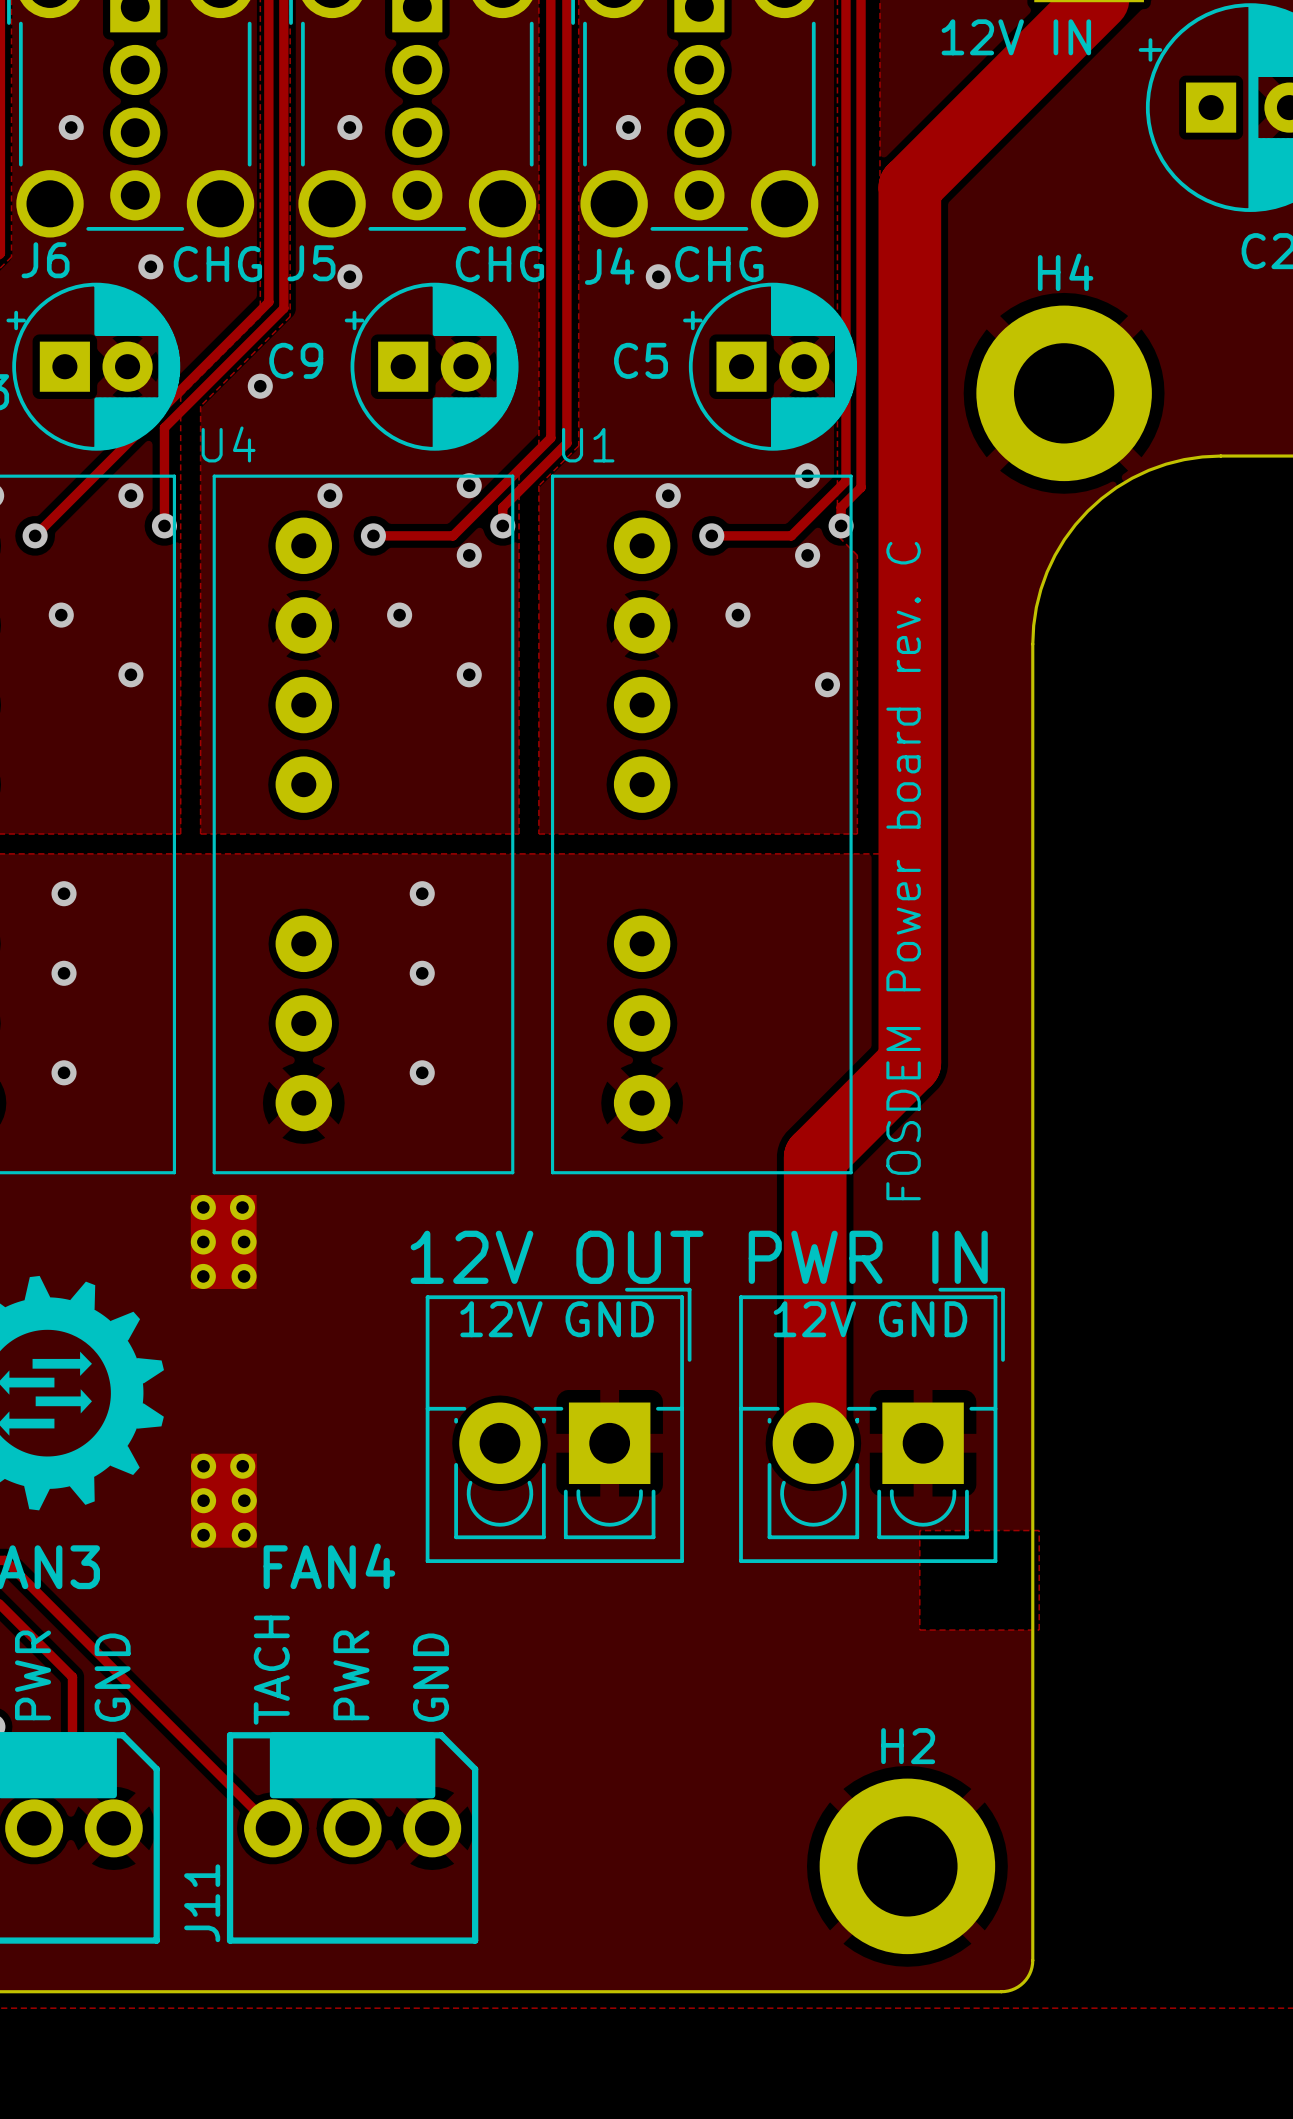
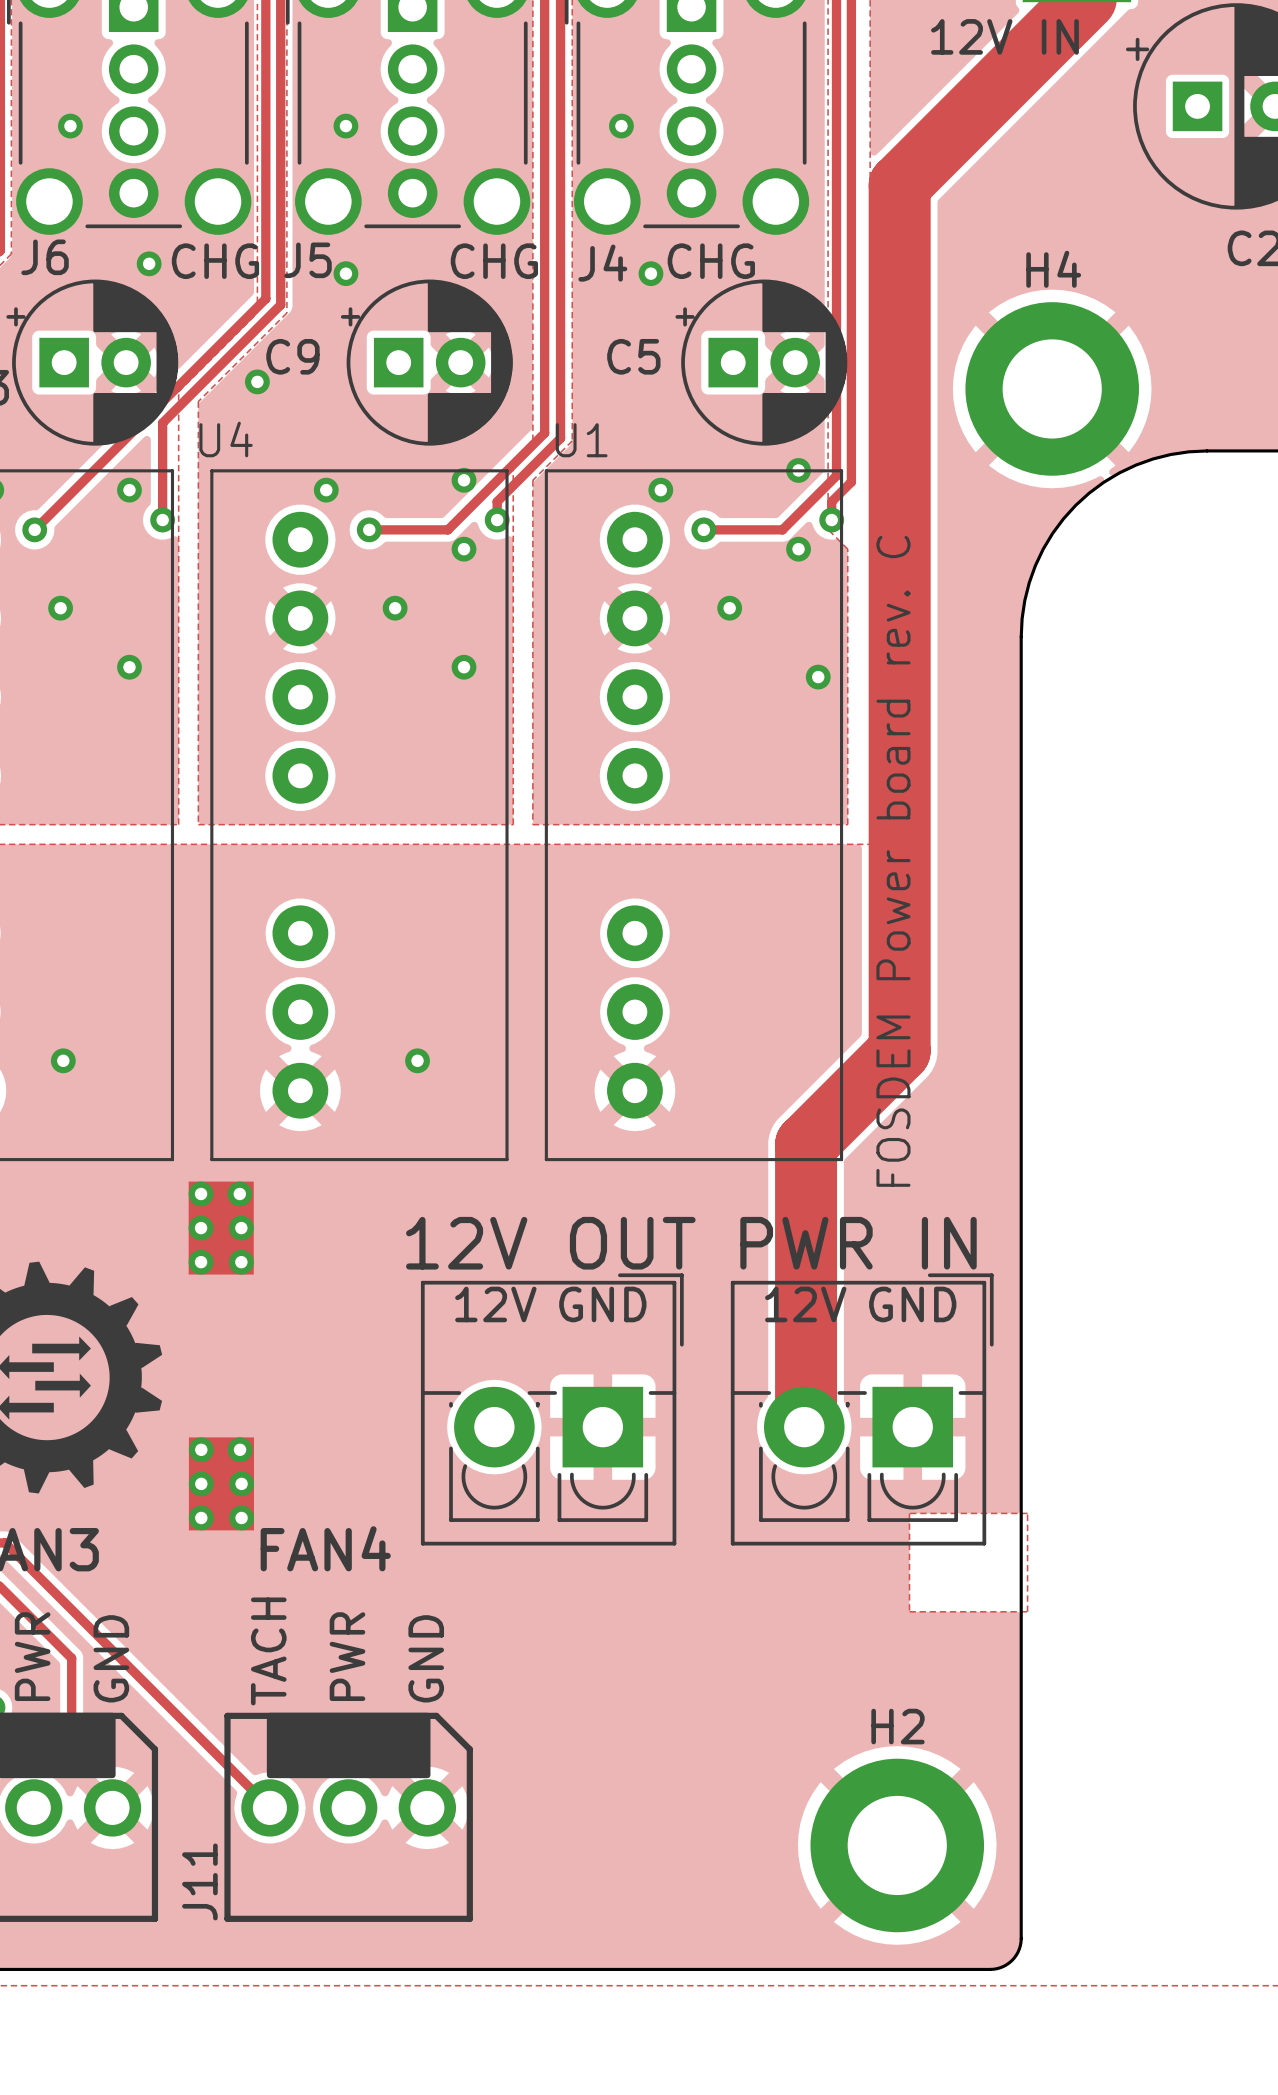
via: (64, 893) -> none
via: (422, 893) -> none
via: (64, 973) -> none
via: (422, 973) -> none

